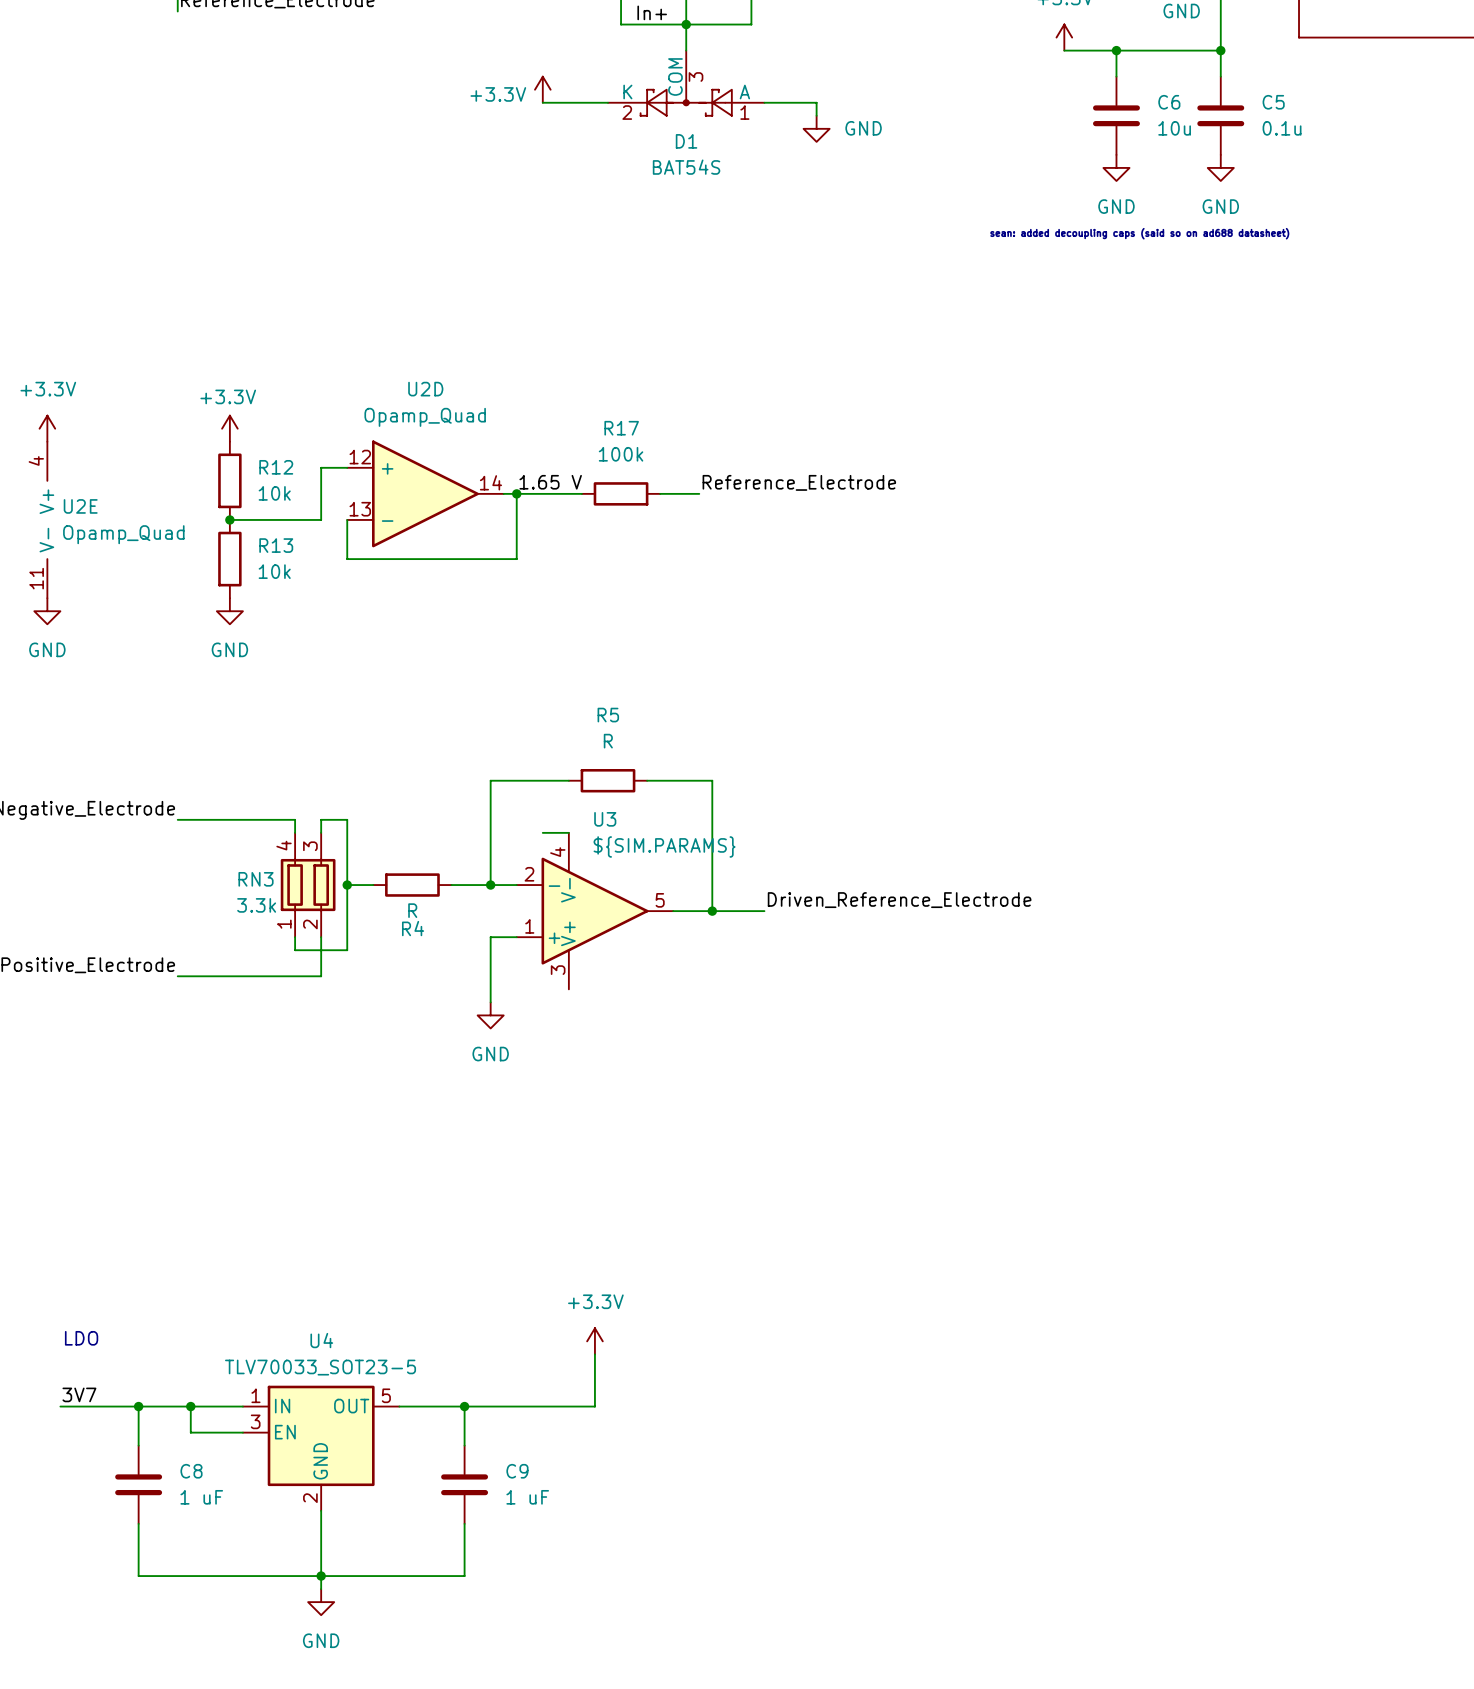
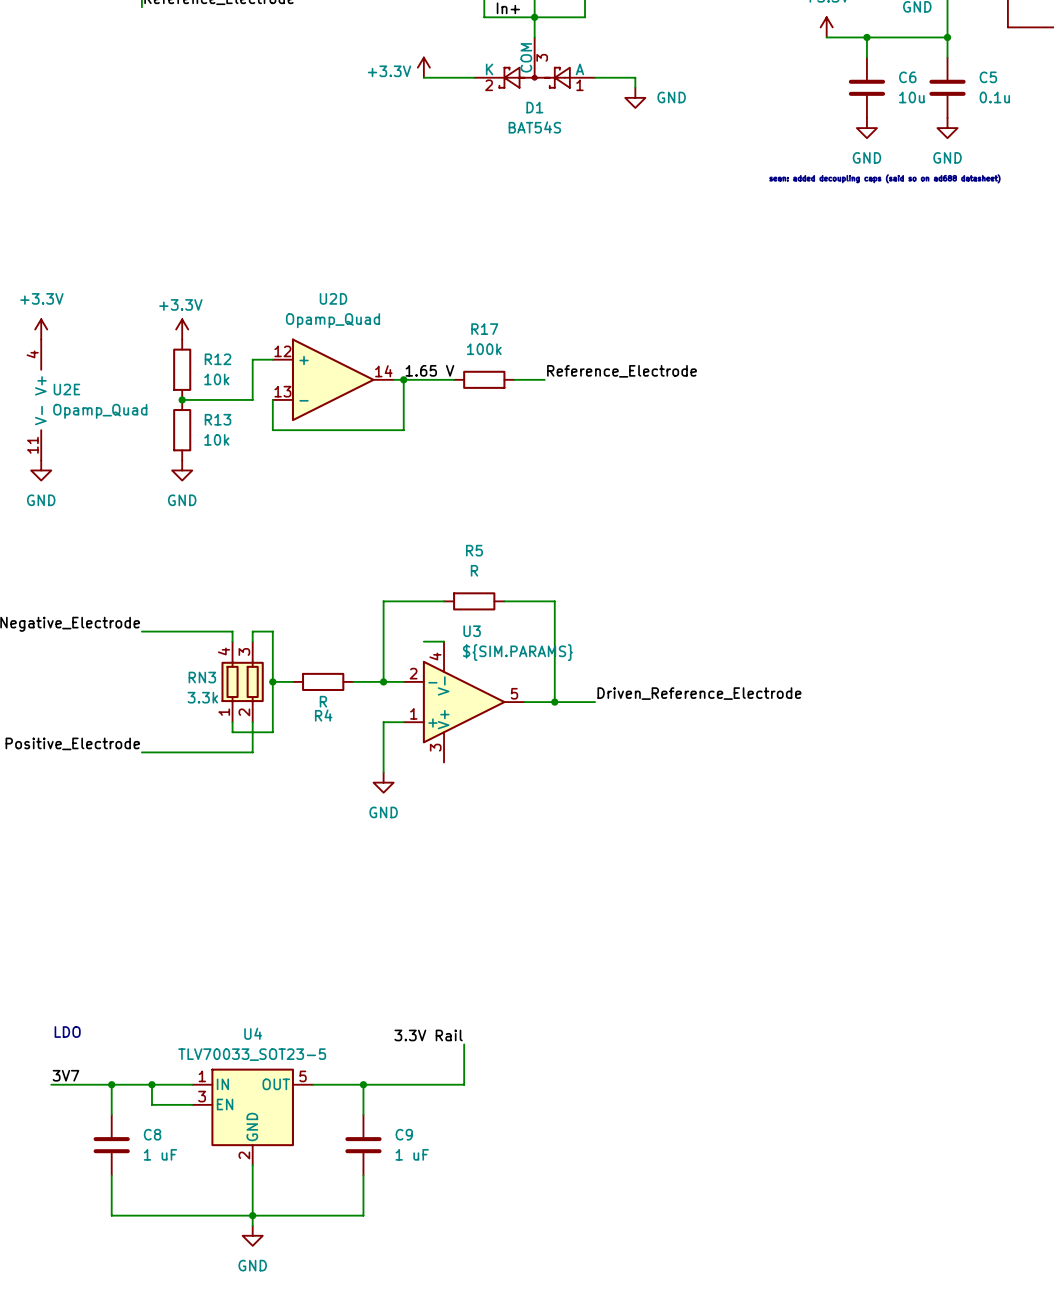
power symbol: +3.3V (594, 1341) -> none
label: none -> 3.3V Rail (428, 1035)

